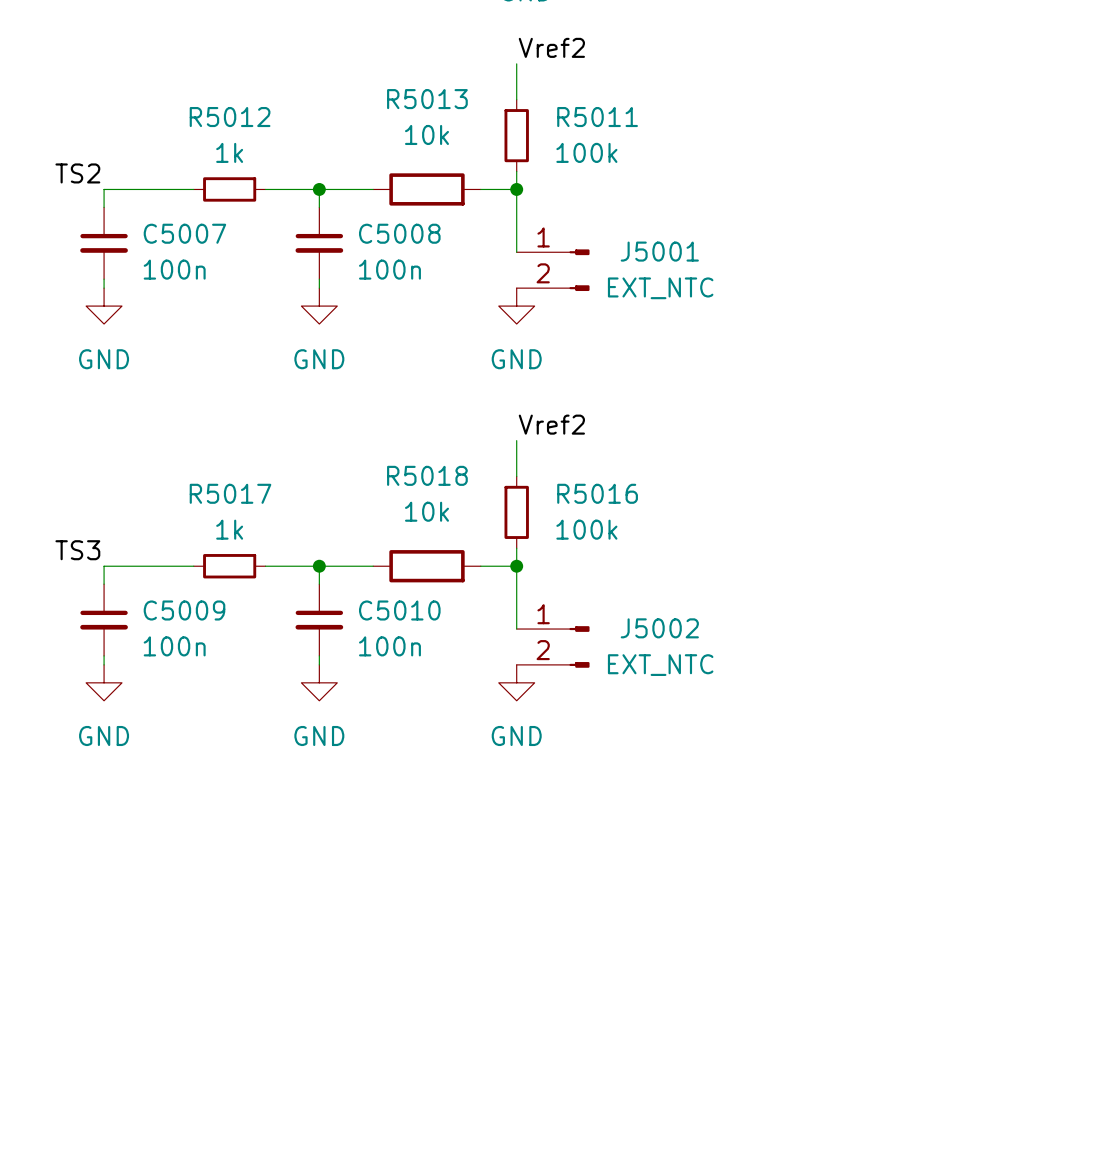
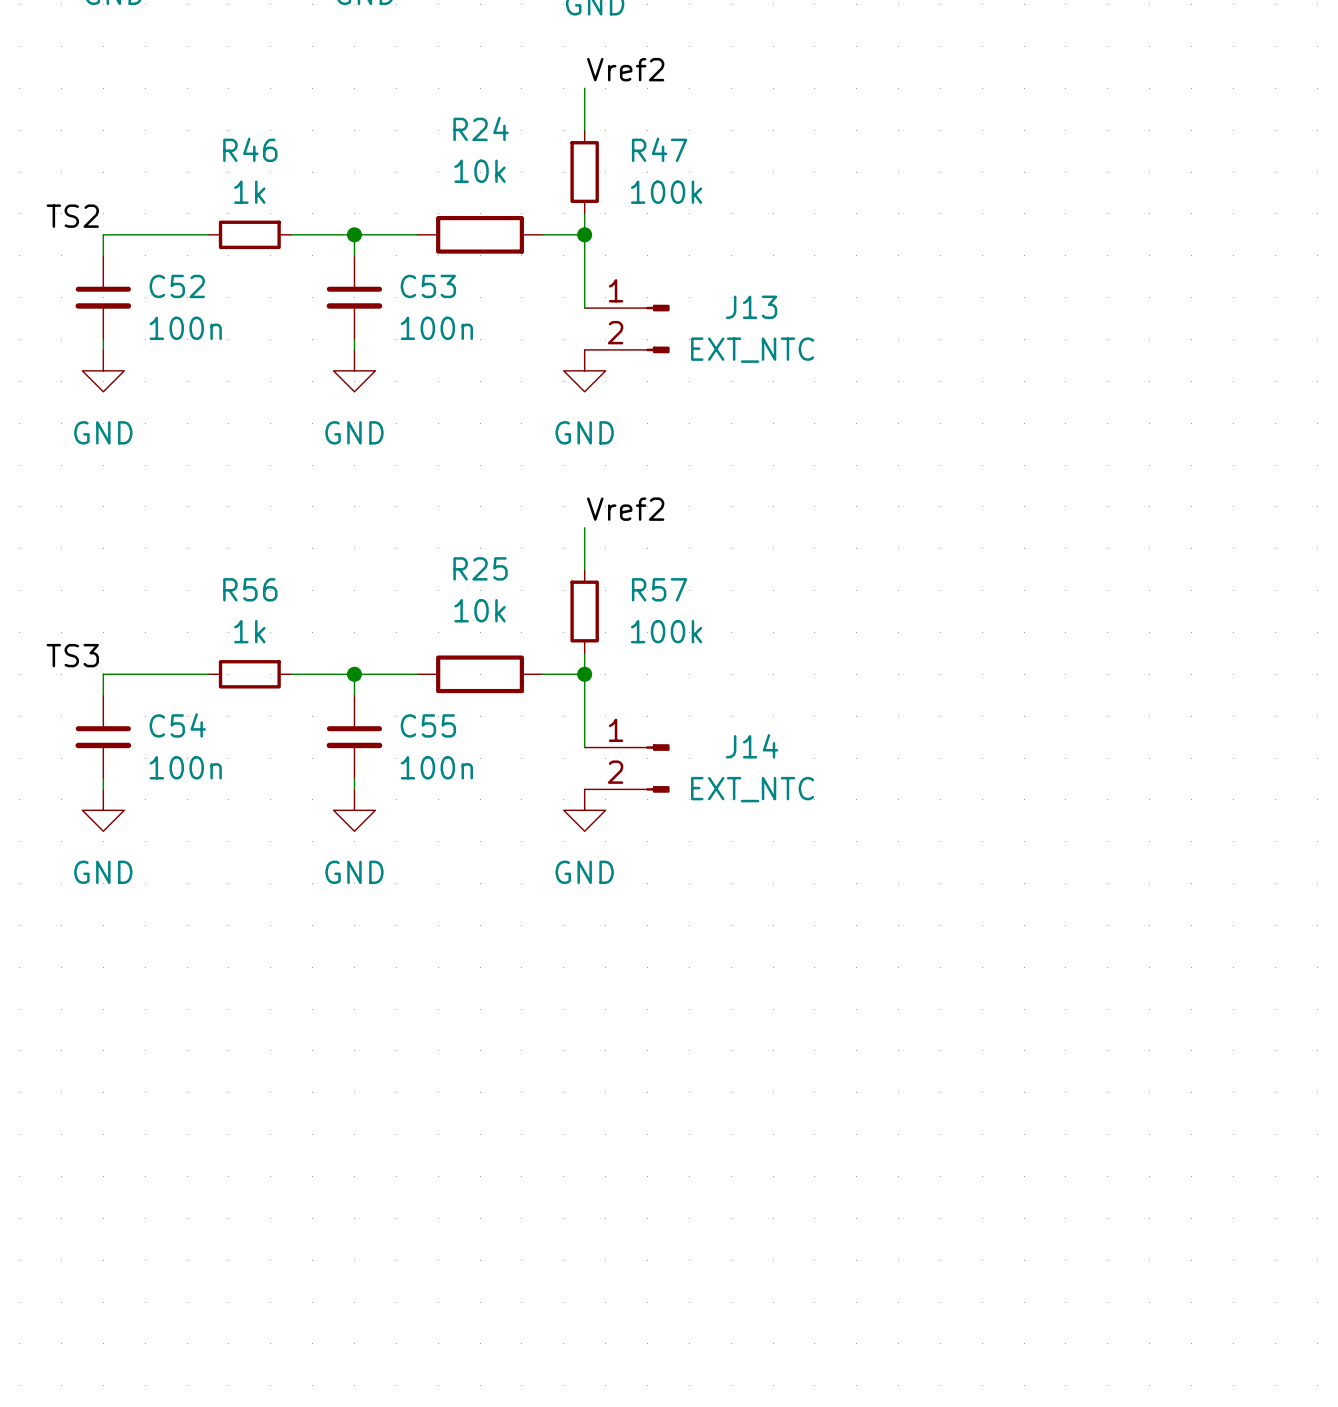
R5013 name: R5013 (427, 99) -> R24 (481, 128)
R5012 name: R5012 (230, 117) -> R46 (250, 149)
R5011 name: R5011 (597, 117) -> R47 (659, 149)
C5007 name: C5007 (184, 233) -> C52 (177, 286)
C5008 name: C5008 (399, 233) -> C53 (428, 286)
J5001 name: J5001 (659, 251) -> J13 (751, 307)
R5018 name: R5018 (427, 475) -> R25 (480, 568)
R5017 name: R5017 (230, 493) -> R56 (250, 589)
R5016 name: R5016 (597, 493) -> R57 (659, 589)
C5009 name: C5009 (184, 610) -> C54 (177, 725)
C5010 name: C5010 (399, 610) -> C55 (428, 725)
J5002 name: J5002 (659, 628) -> J14 (752, 746)

